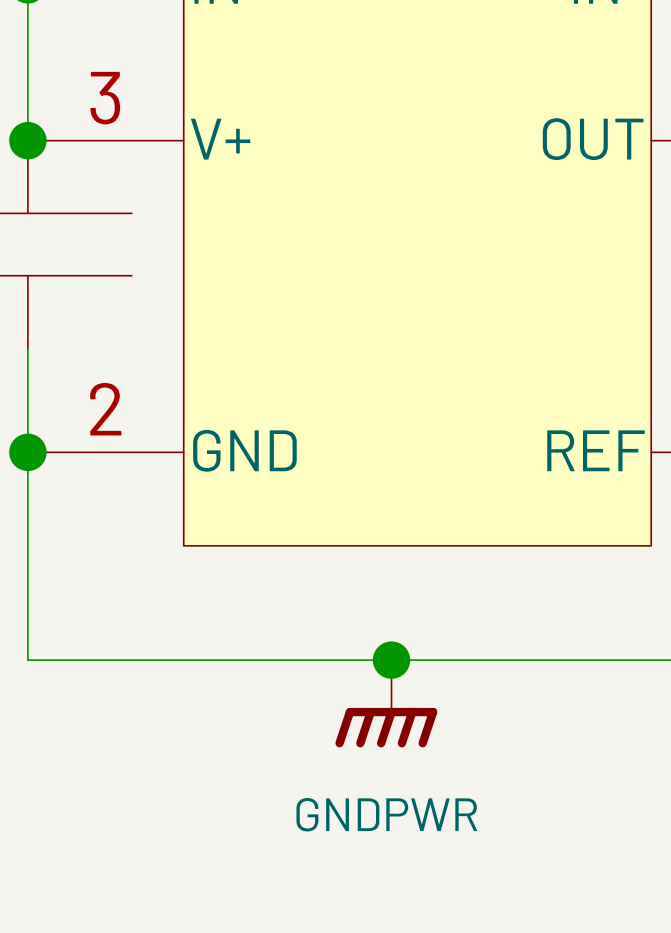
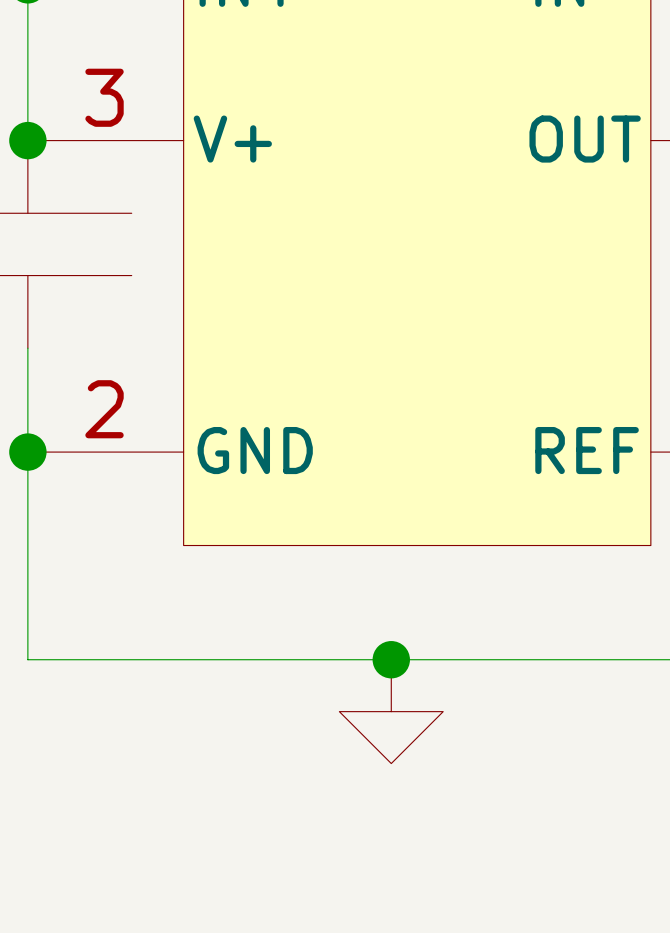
power symbol shape: [335, 660, 438, 748] -> [339, 659, 444, 764]
power symbol text: GNDPWR (386, 814) -> none

